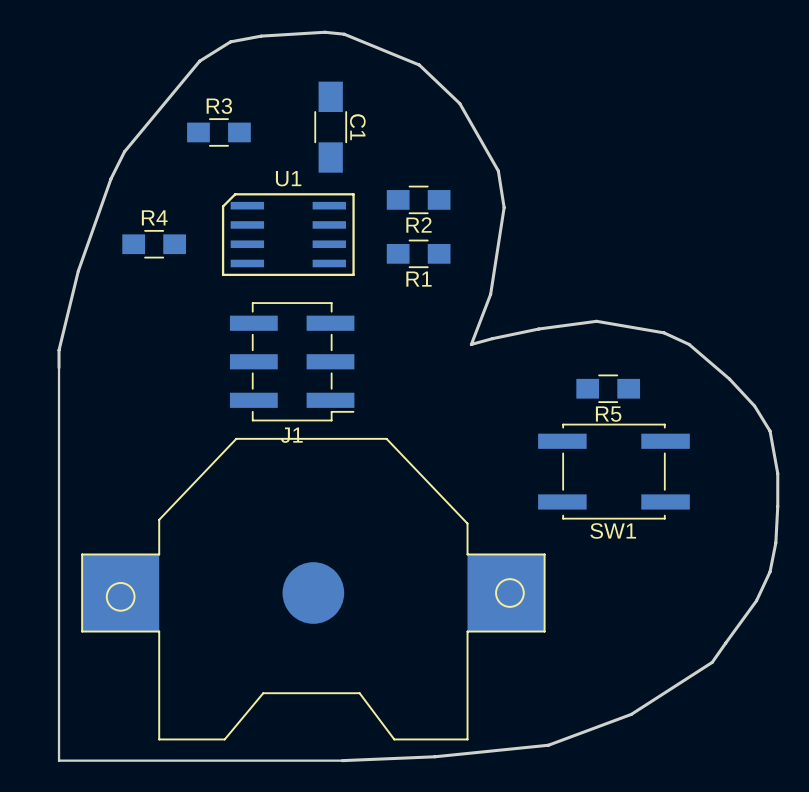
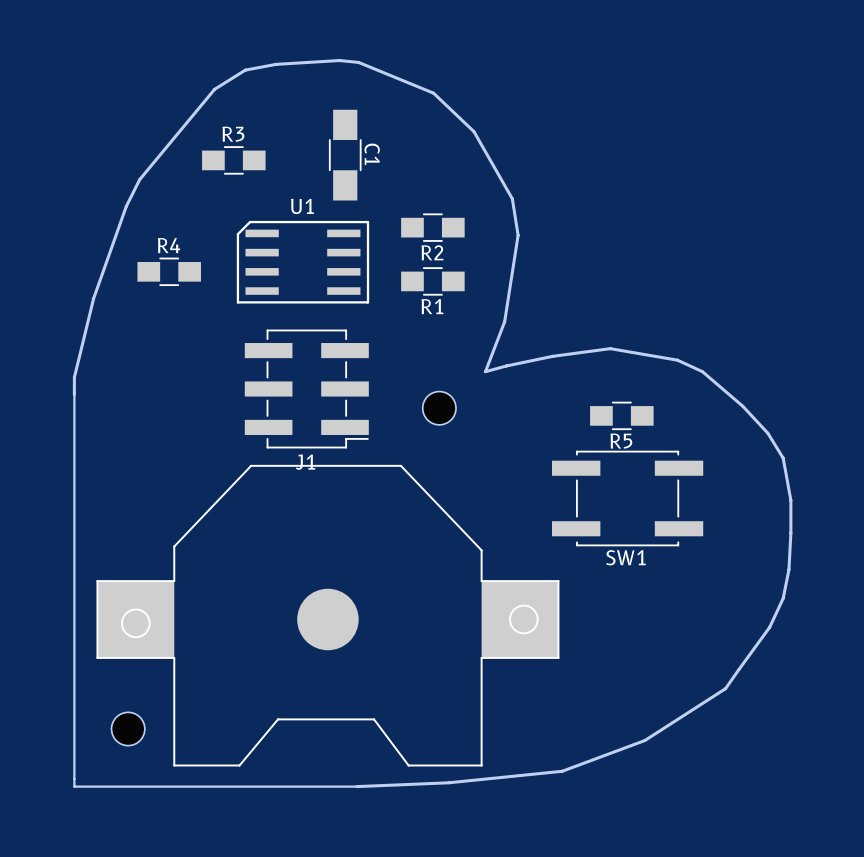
part: none -> (439, 408)
part: none -> (128, 729)

